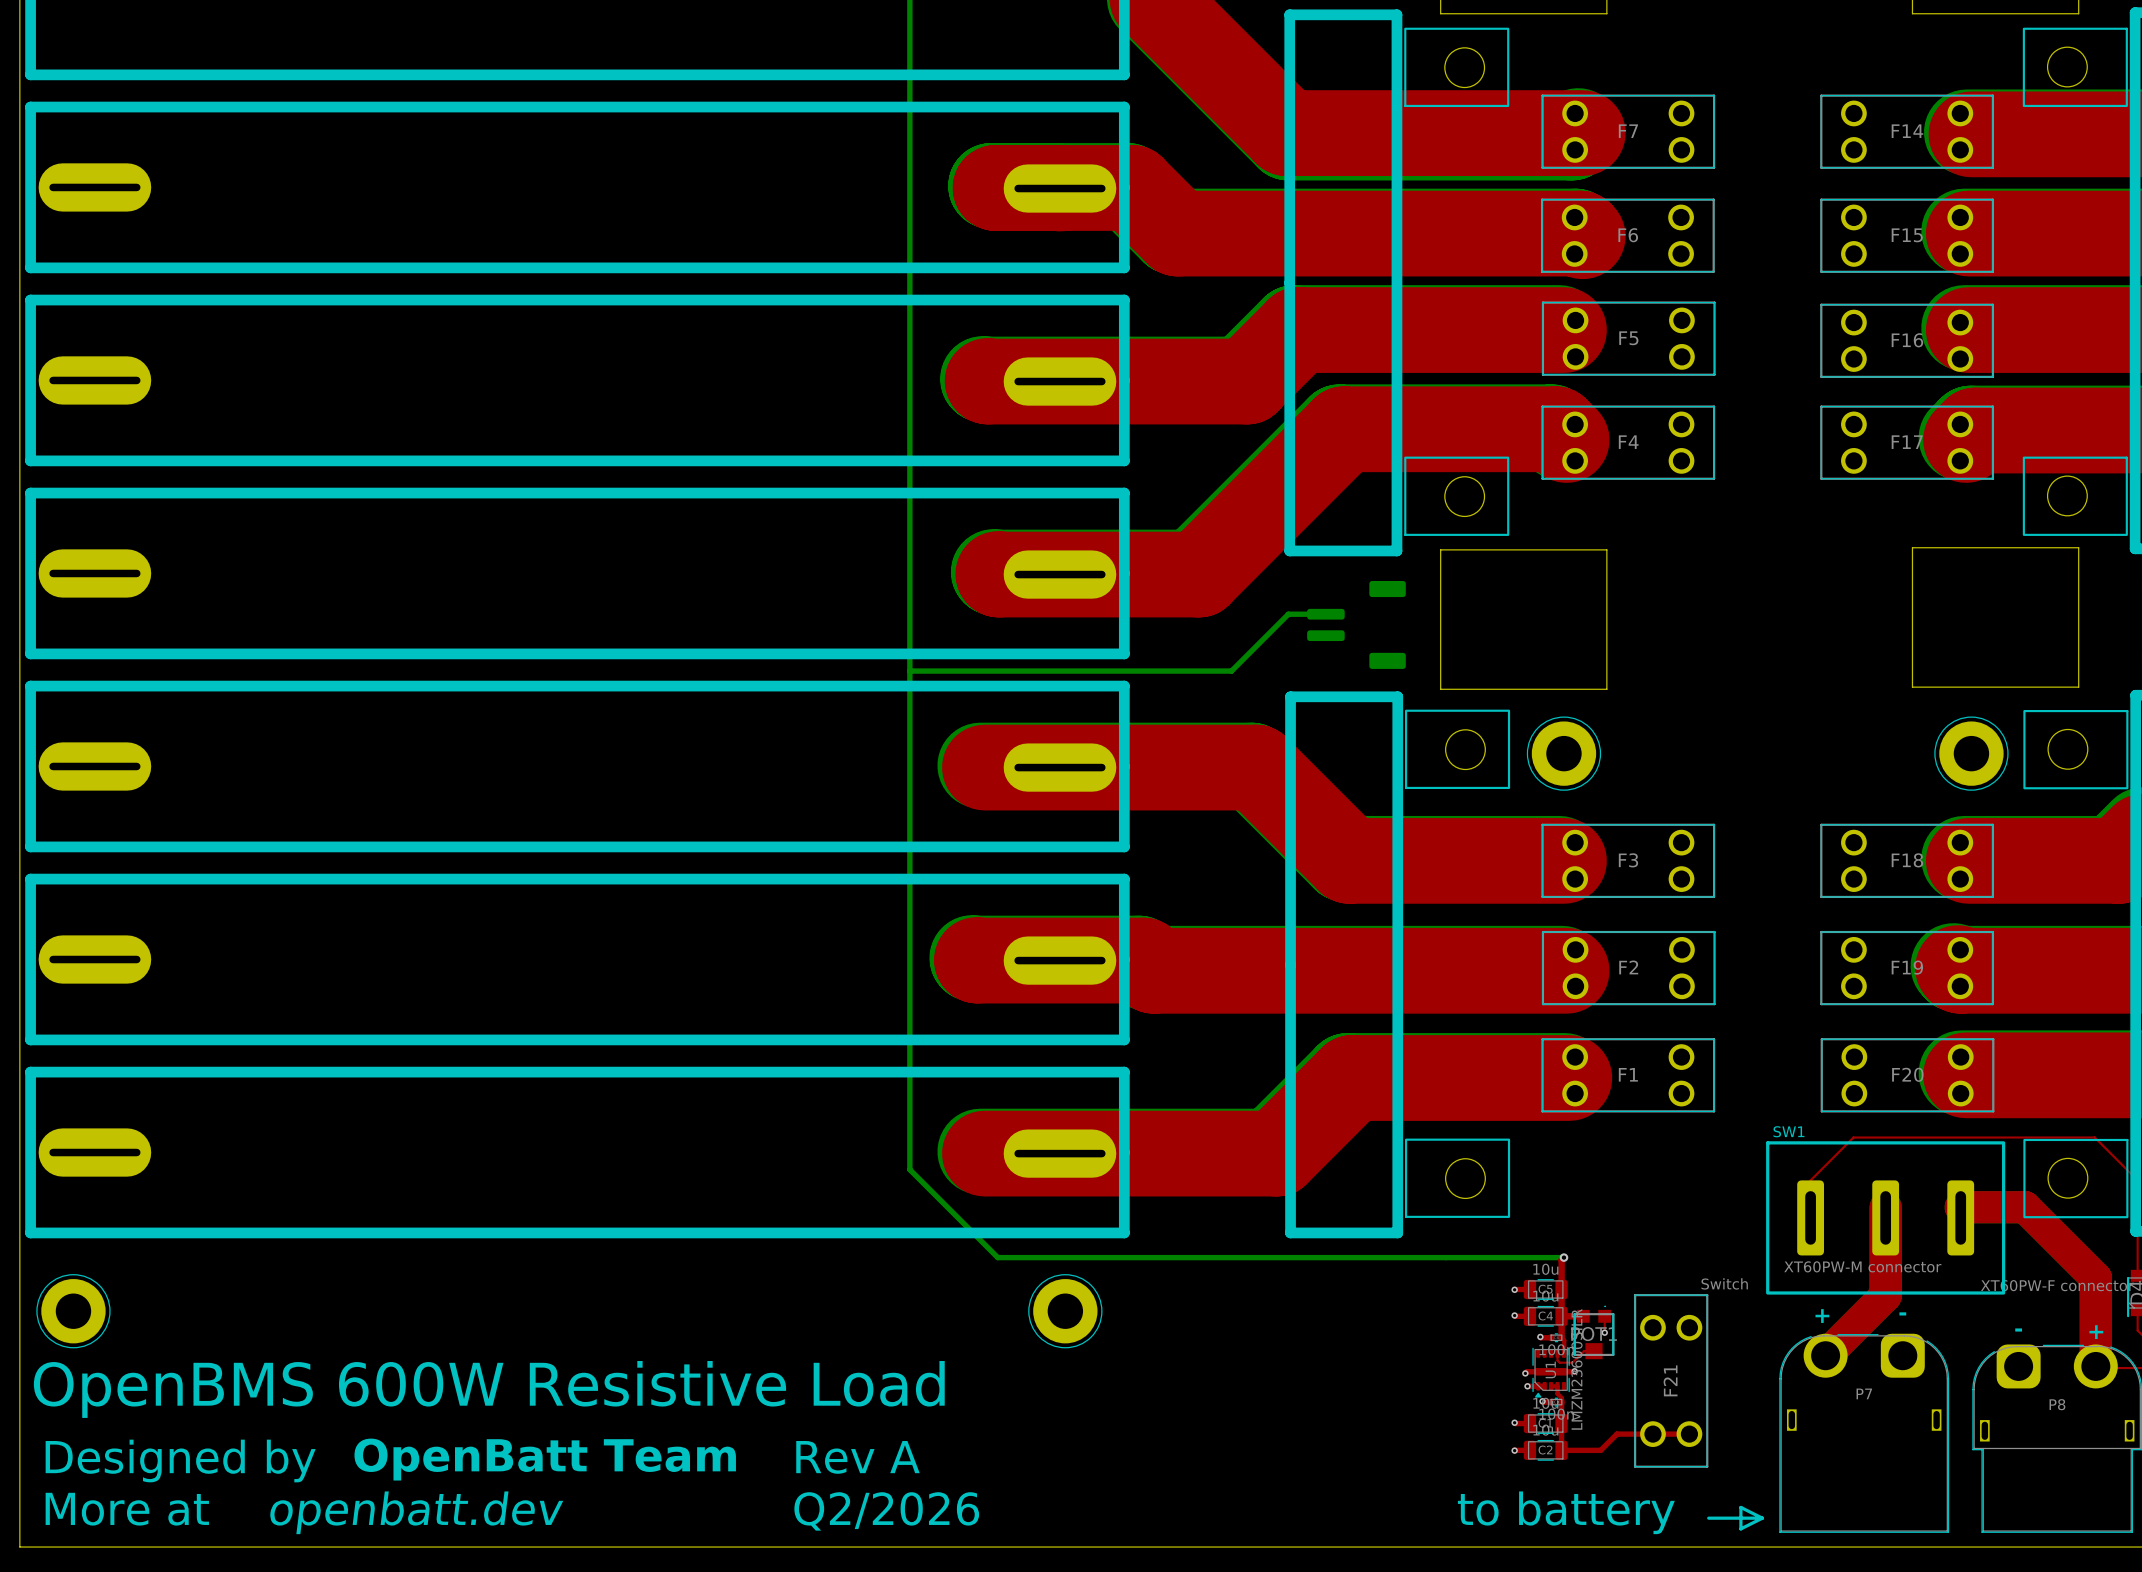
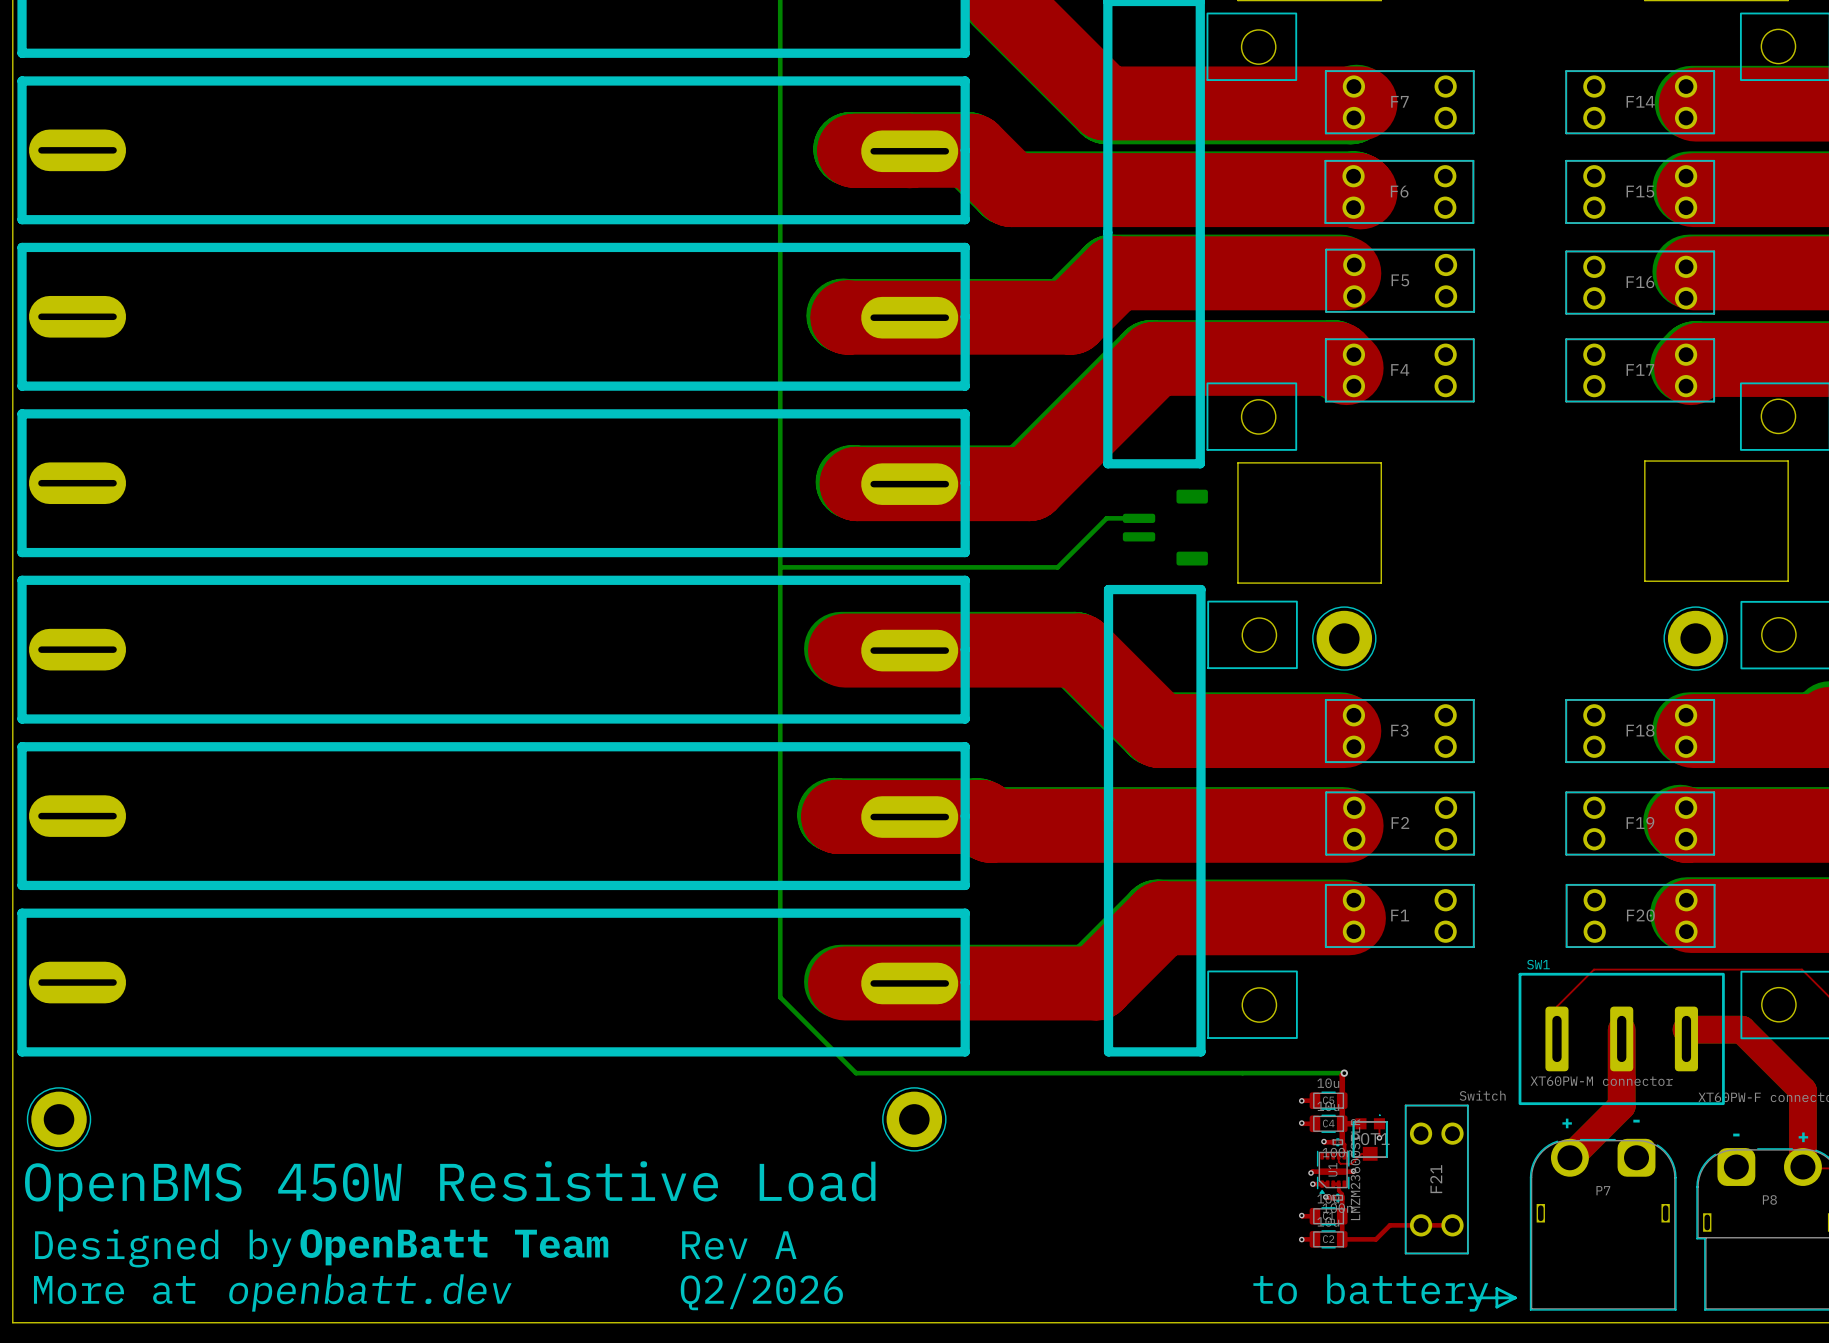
text: OpenBMS 600W Resistive Load (489, 1389) -> OpenBMS 450W Resistive Load (450, 1186)

